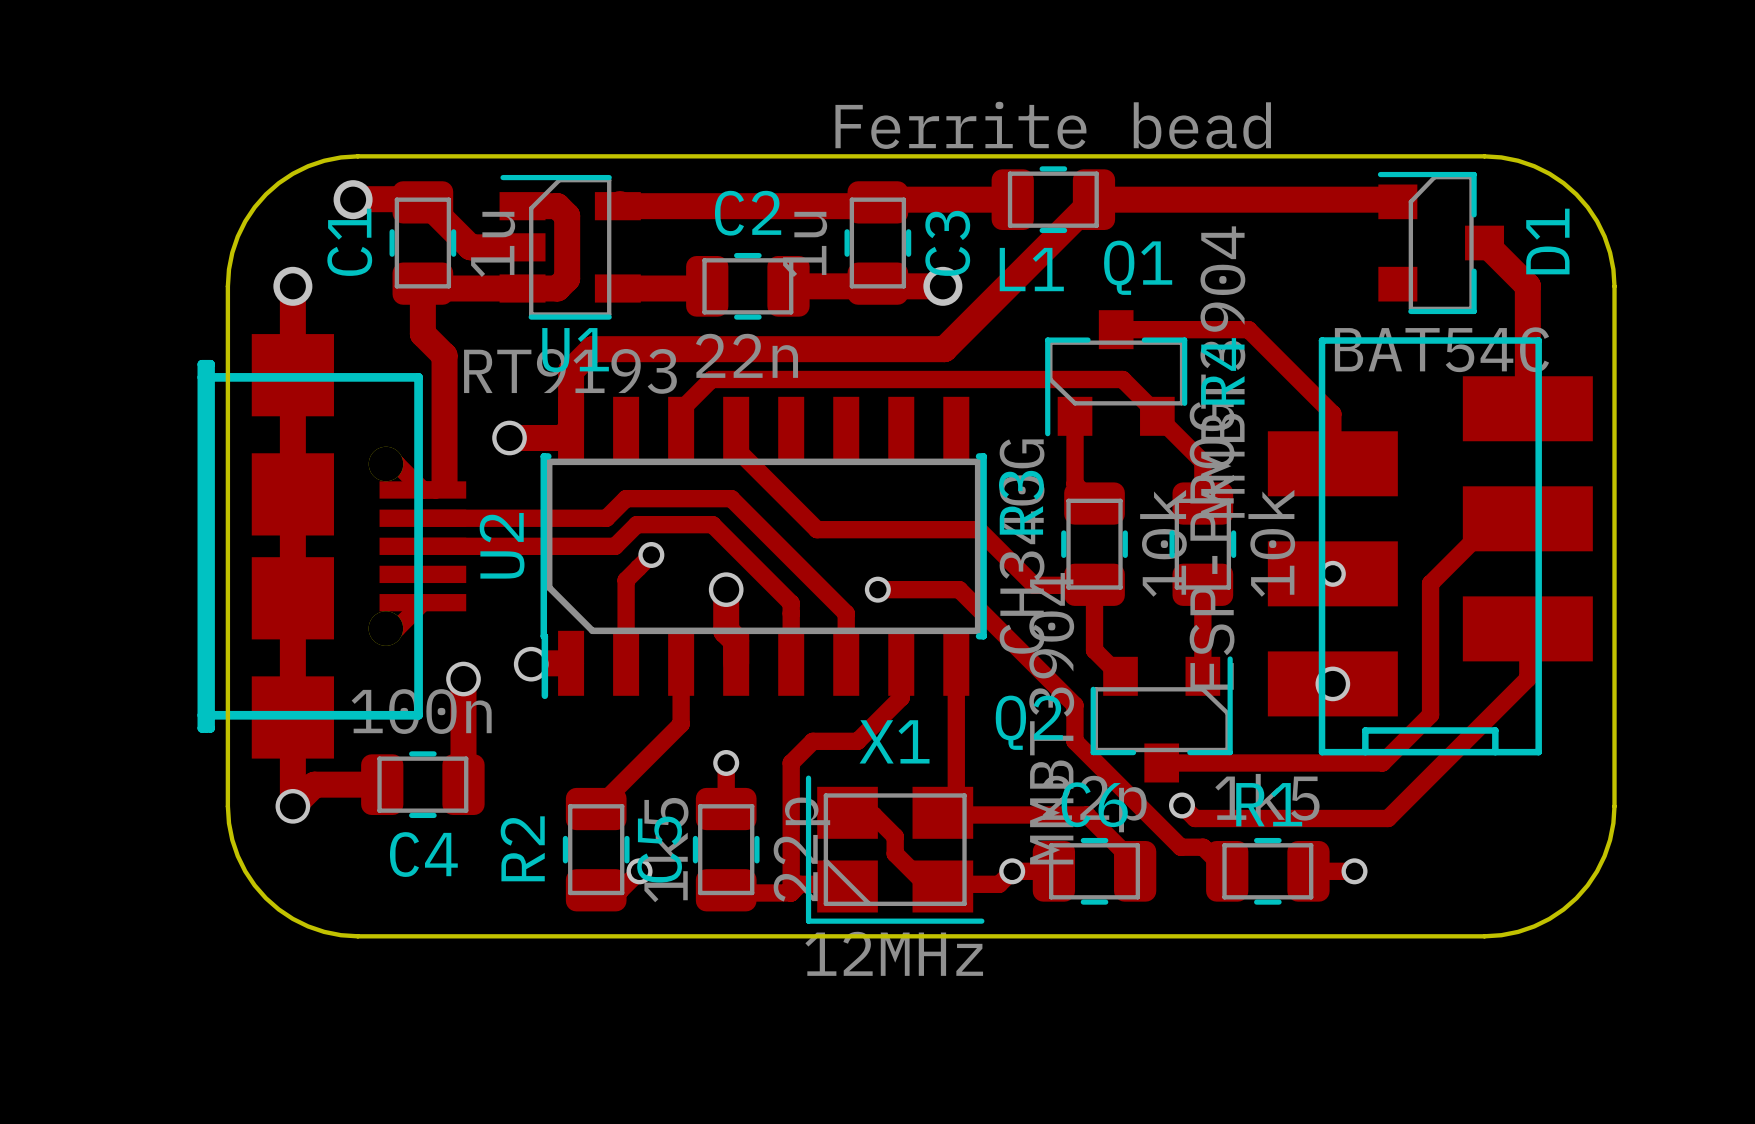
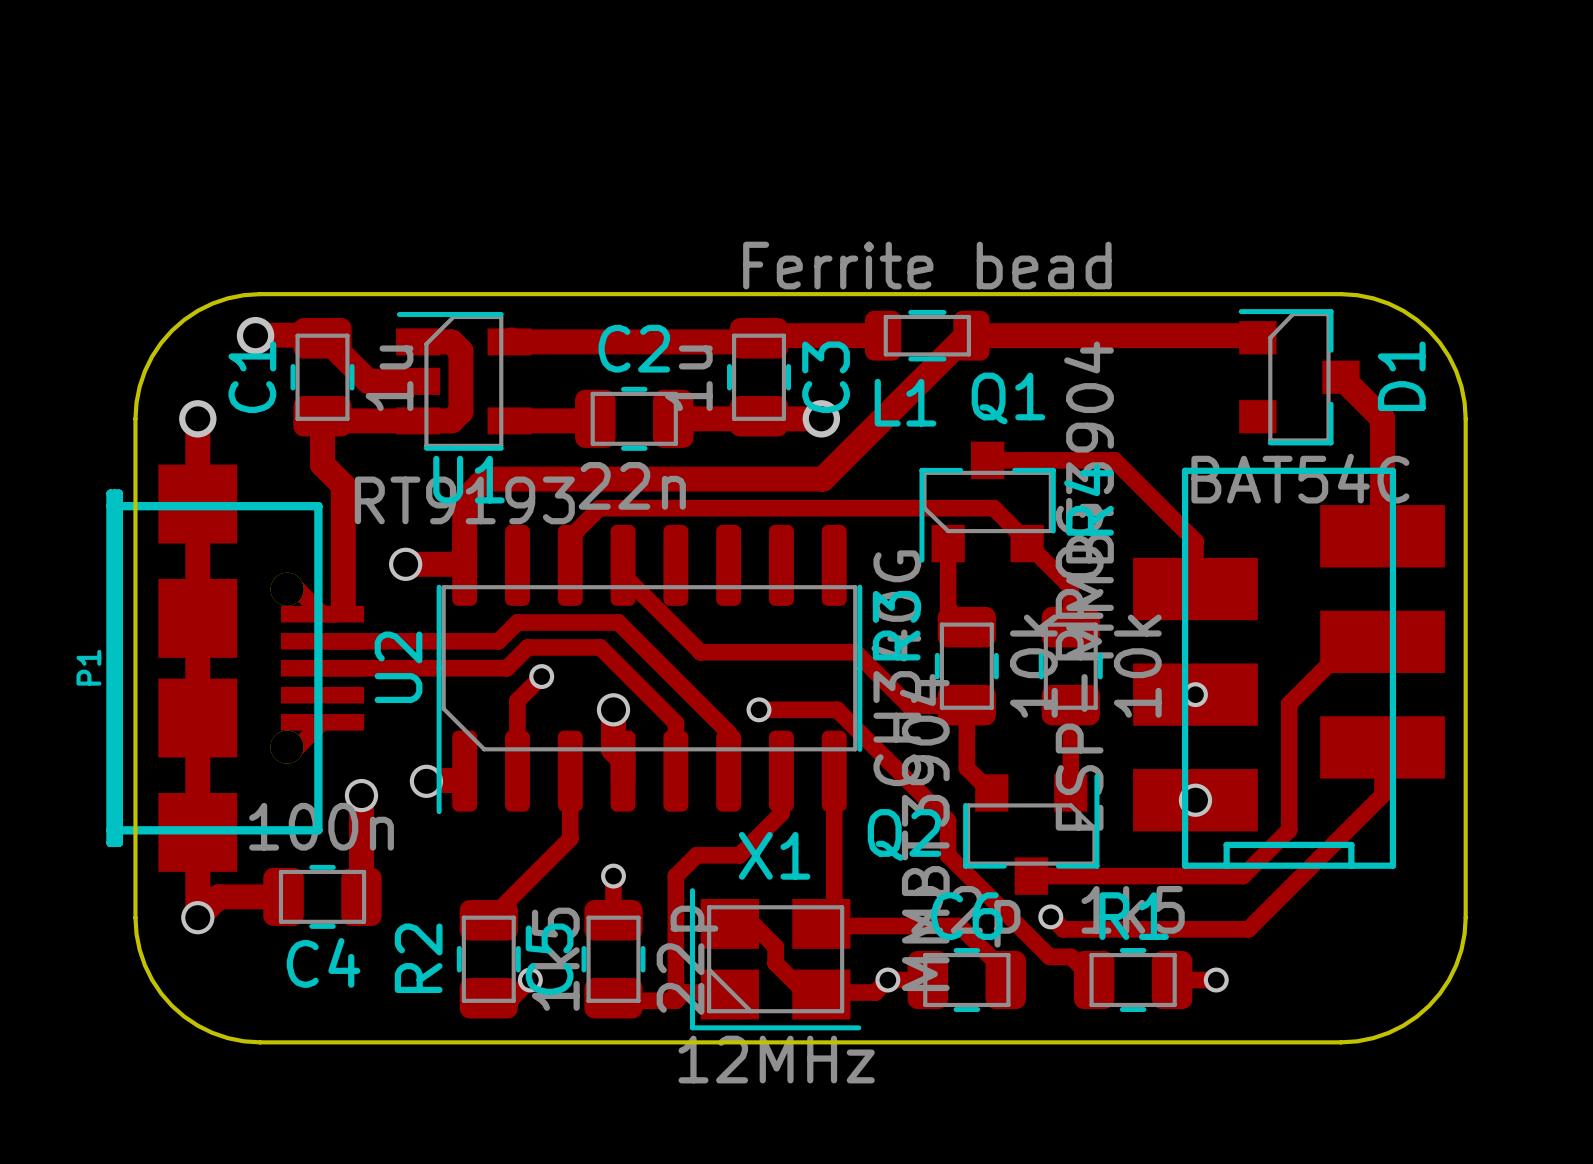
L1 footprint: [991, 166, 1116, 234] -> [865, 309, 990, 362]
U2 footprint: [540, 396, 987, 700] -> [436, 524, 863, 815]
P1 name: none -> P1 (88, 667)

